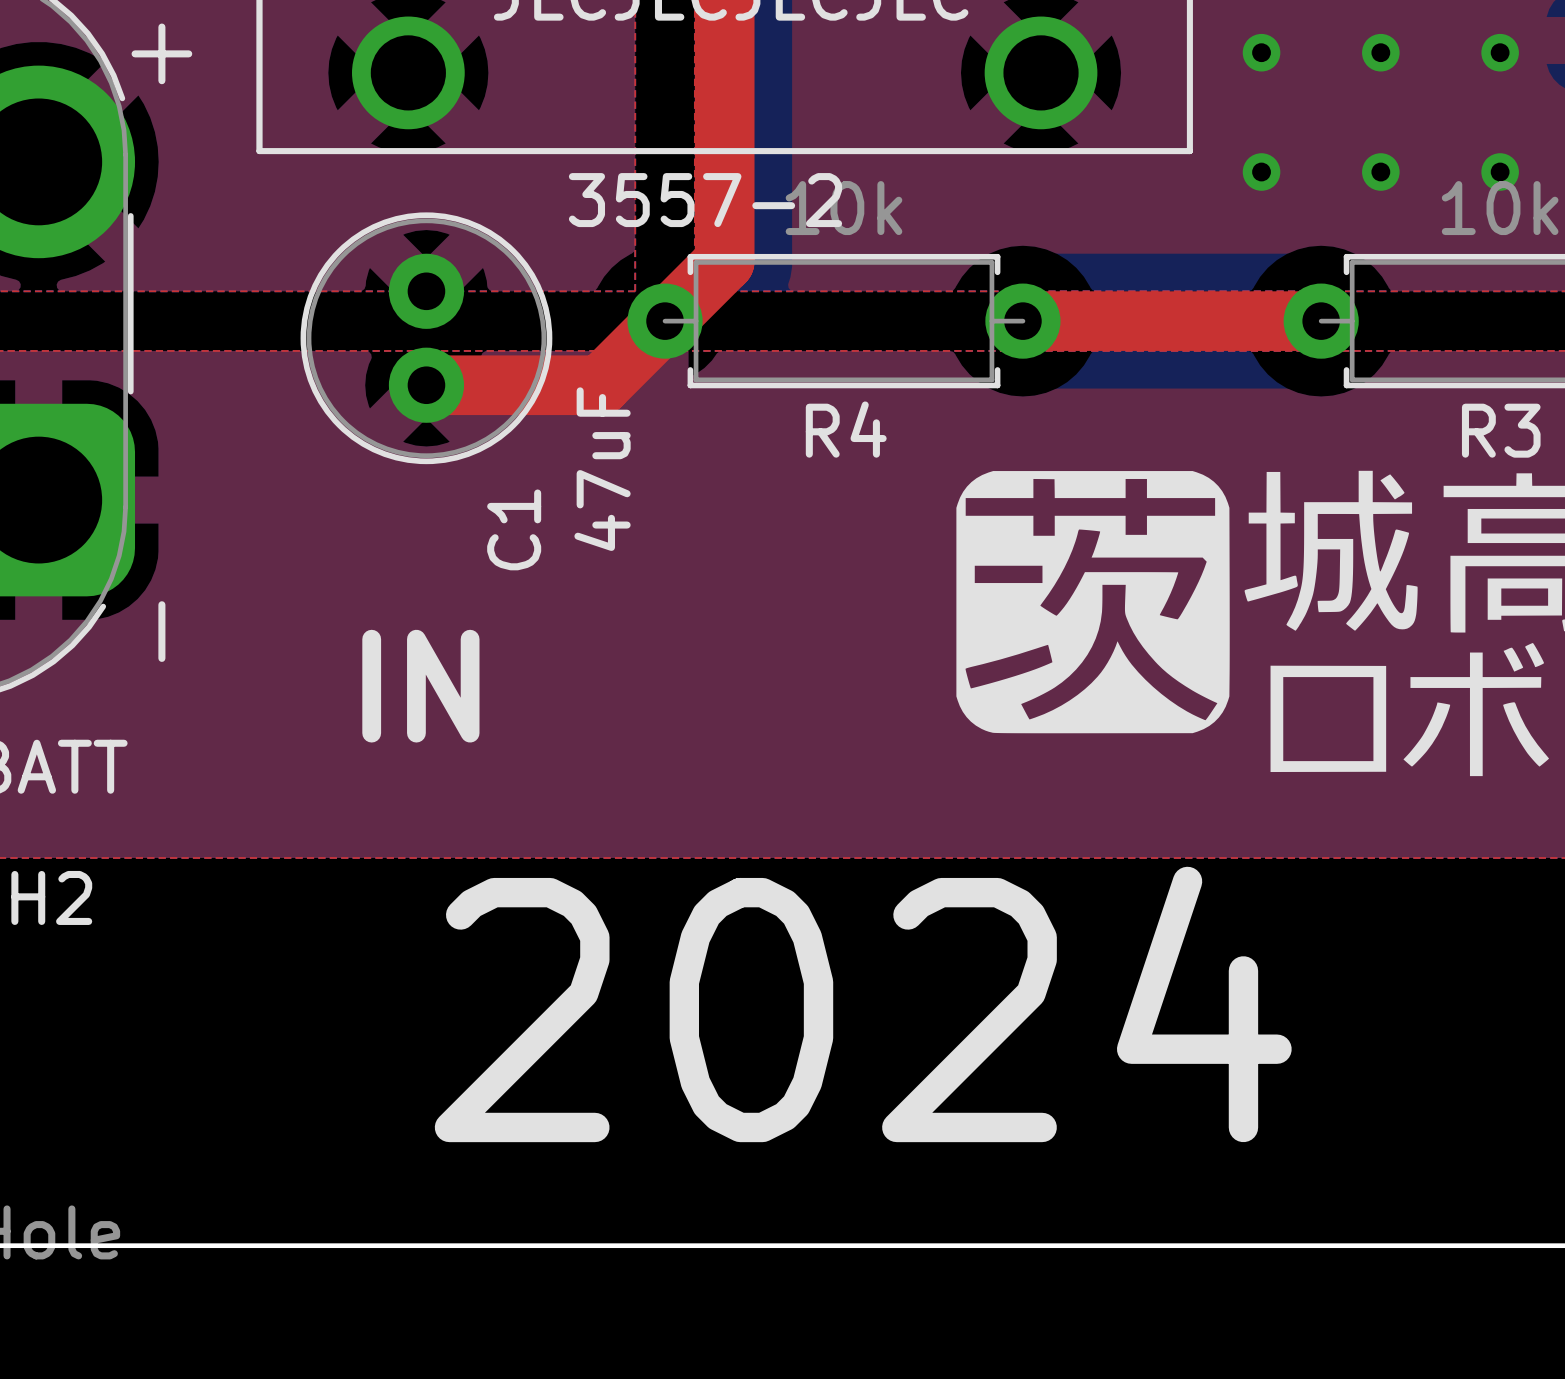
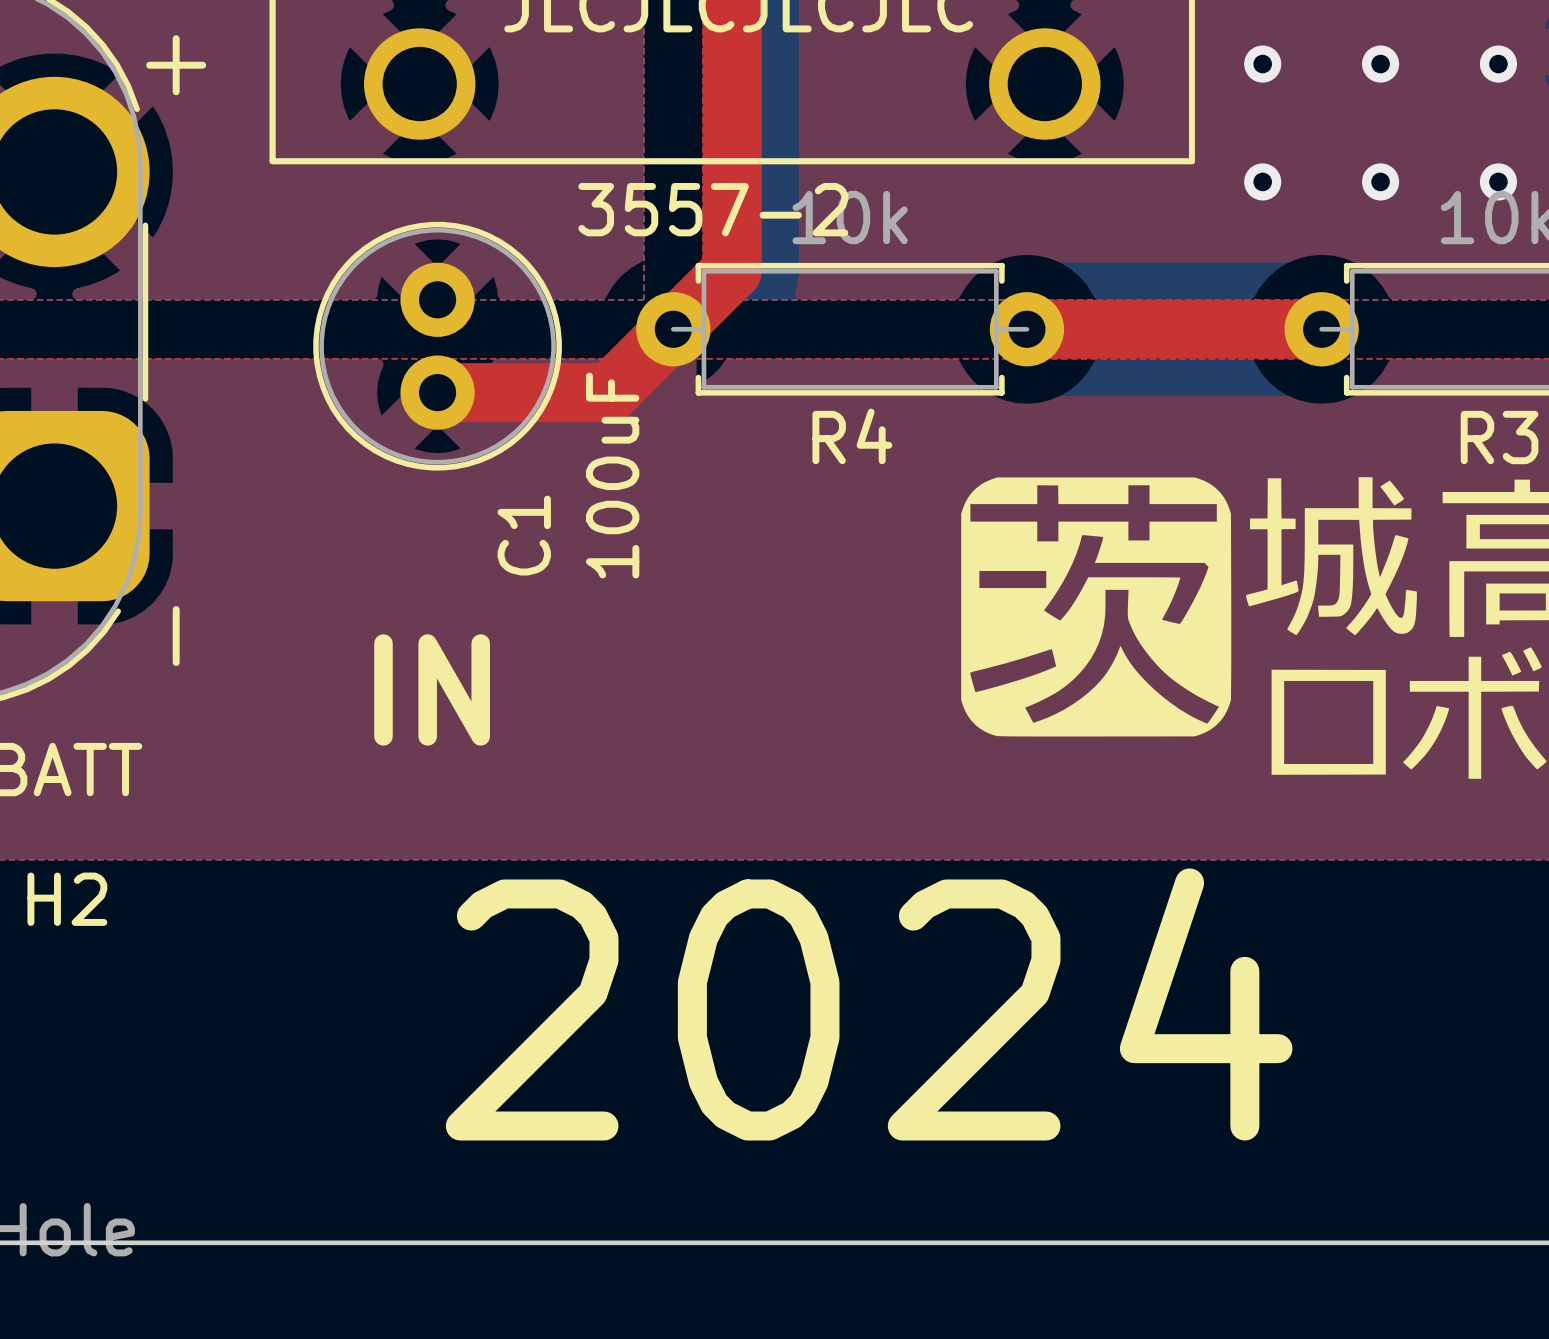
C1 value: 47uF (602, 469) -> 100uF (612, 475)

